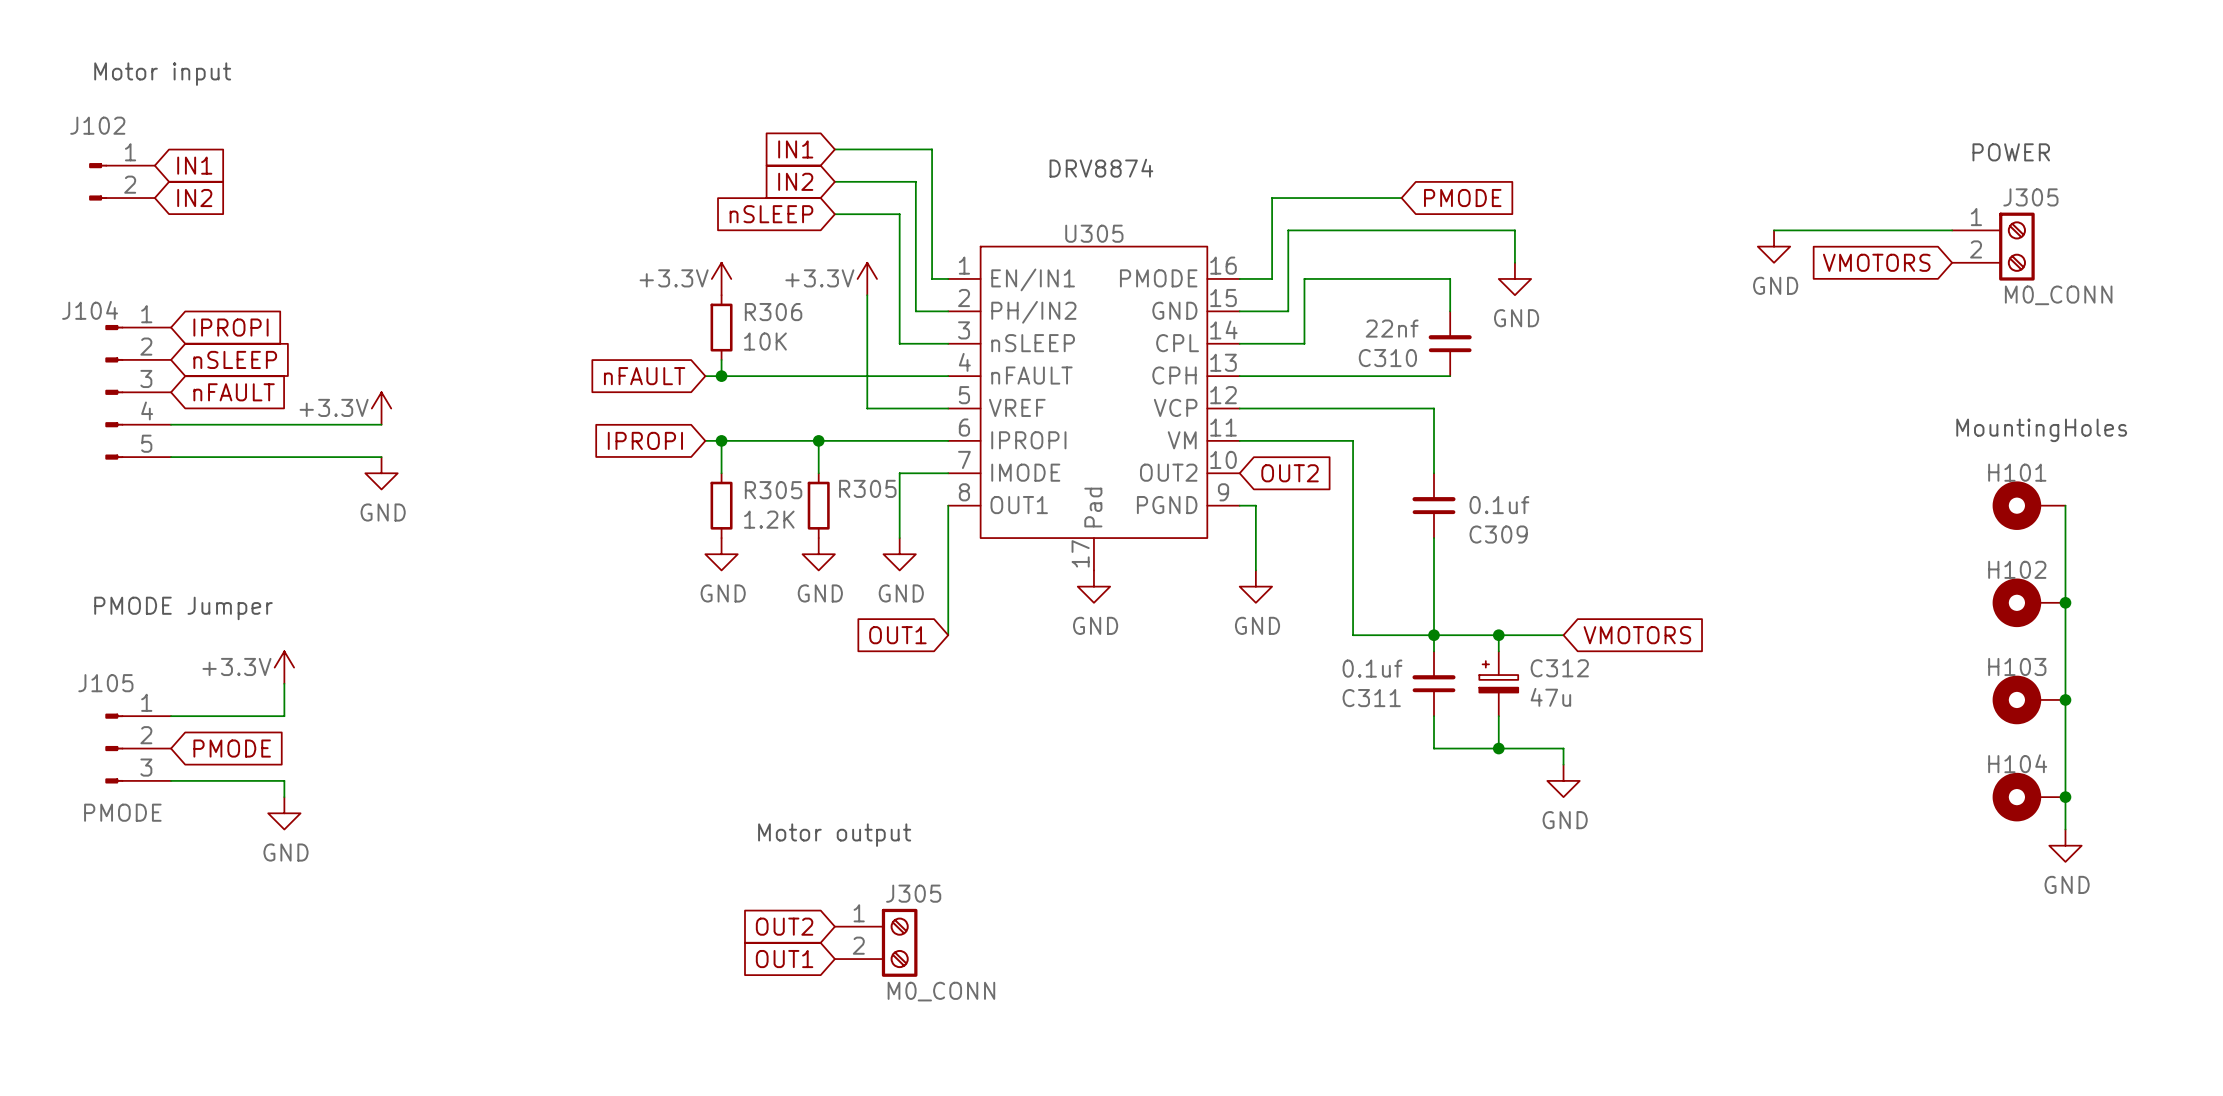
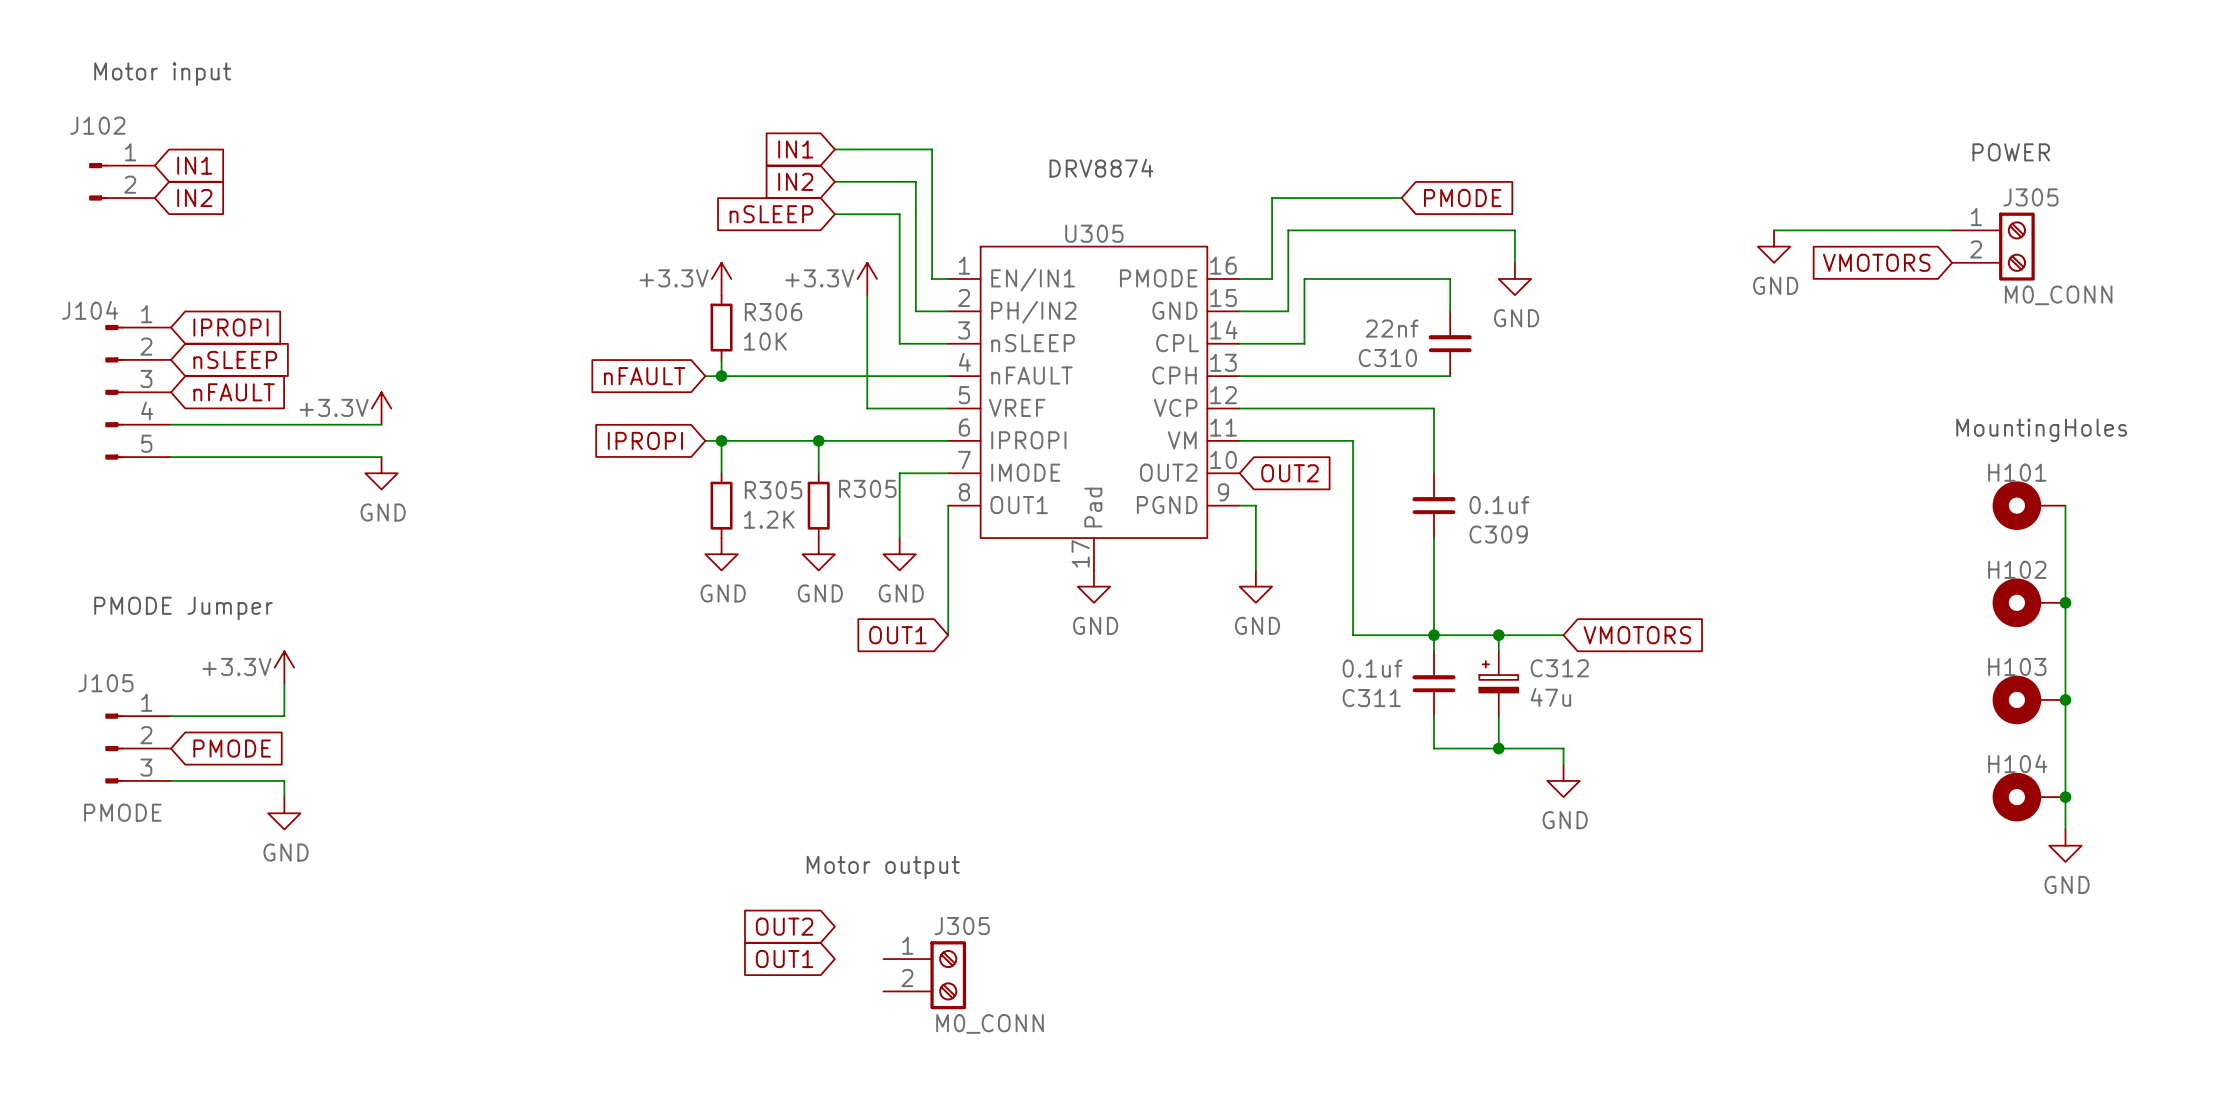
text position: Motor output (834, 835) -> Motor output (883, 867)
J305 position: (876, 942) -> (924, 975)

